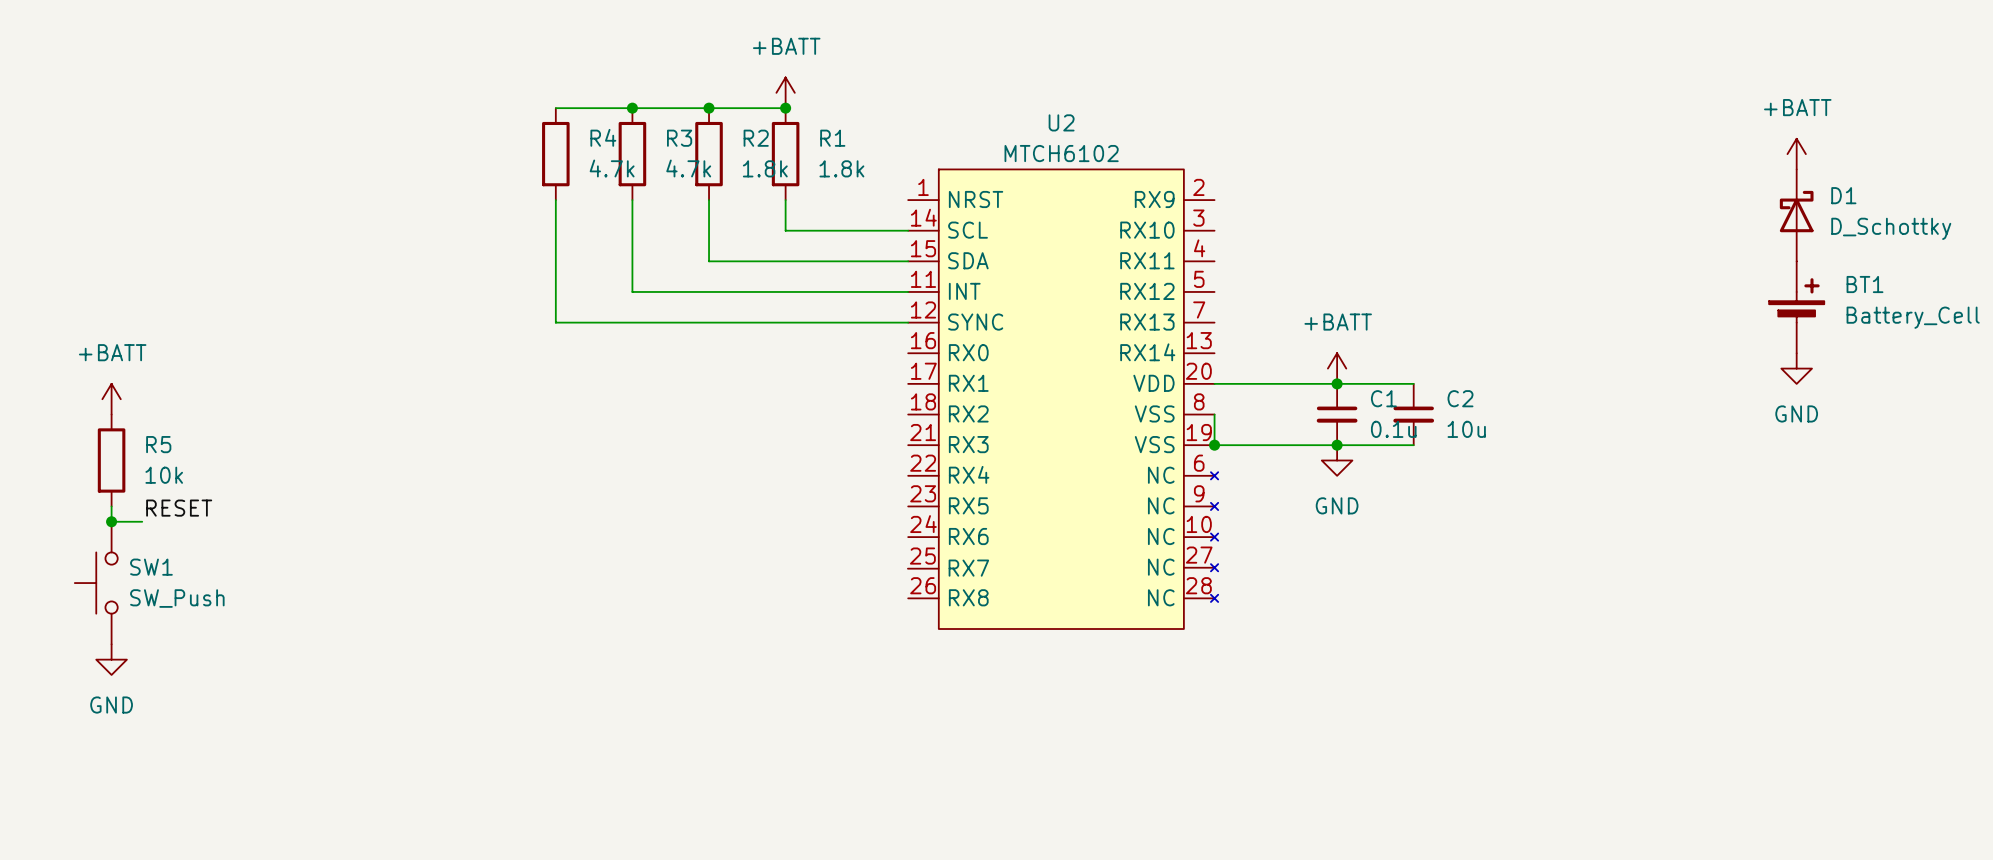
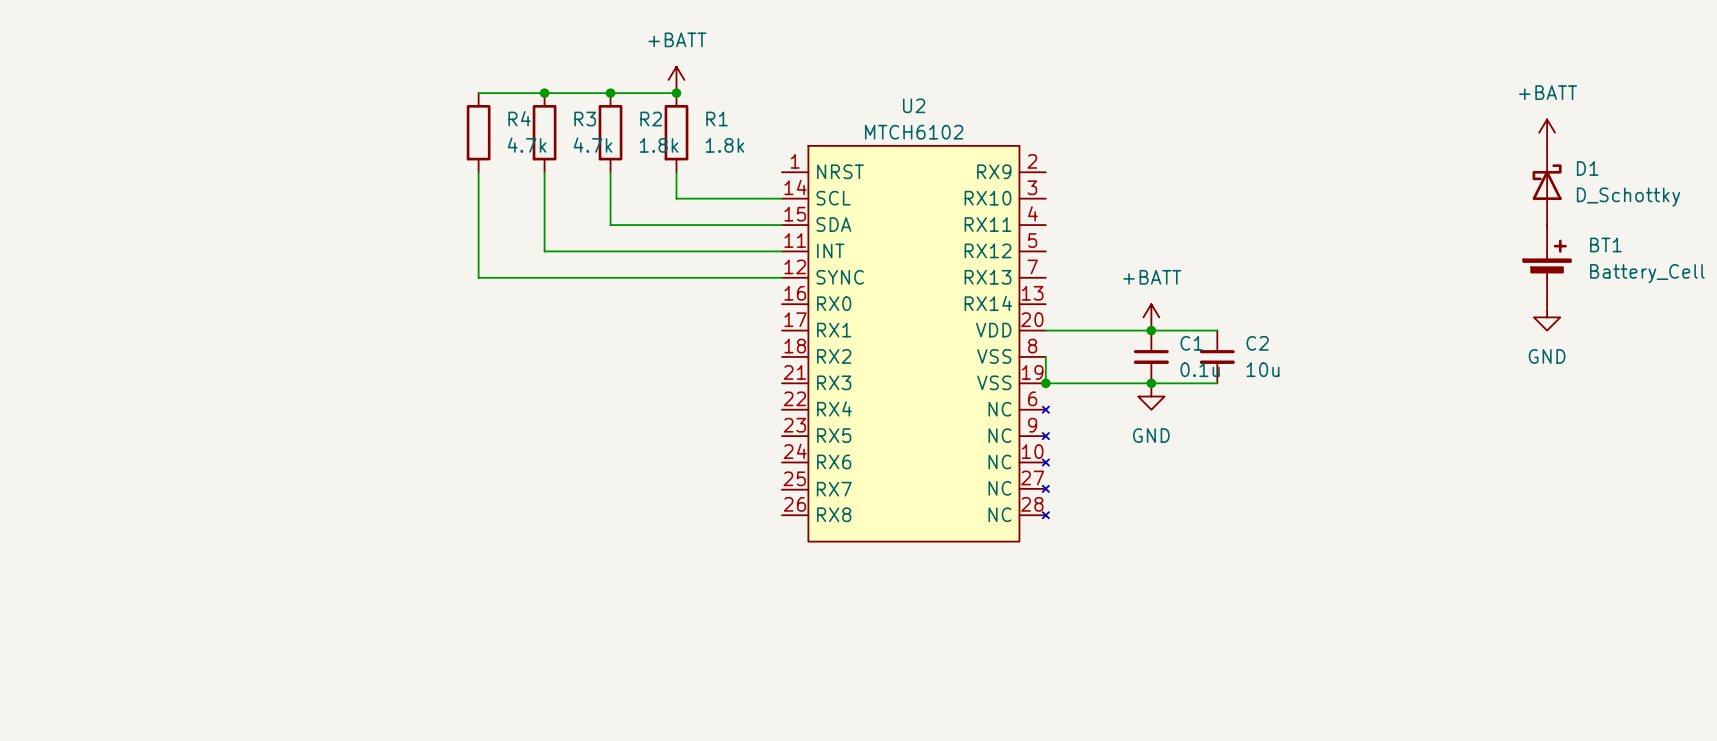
power symbol: +BATT (111, 399) -> none
R5: 10k (111, 460) -> none
wire: (111, 506) (111, 521) (142, 521) -> none
label: RESET (179, 508) -> none
junction: (111, 521) -> none
SW1: SW_Push (96, 583) -> none
power symbol: GND (111, 659) -> none

